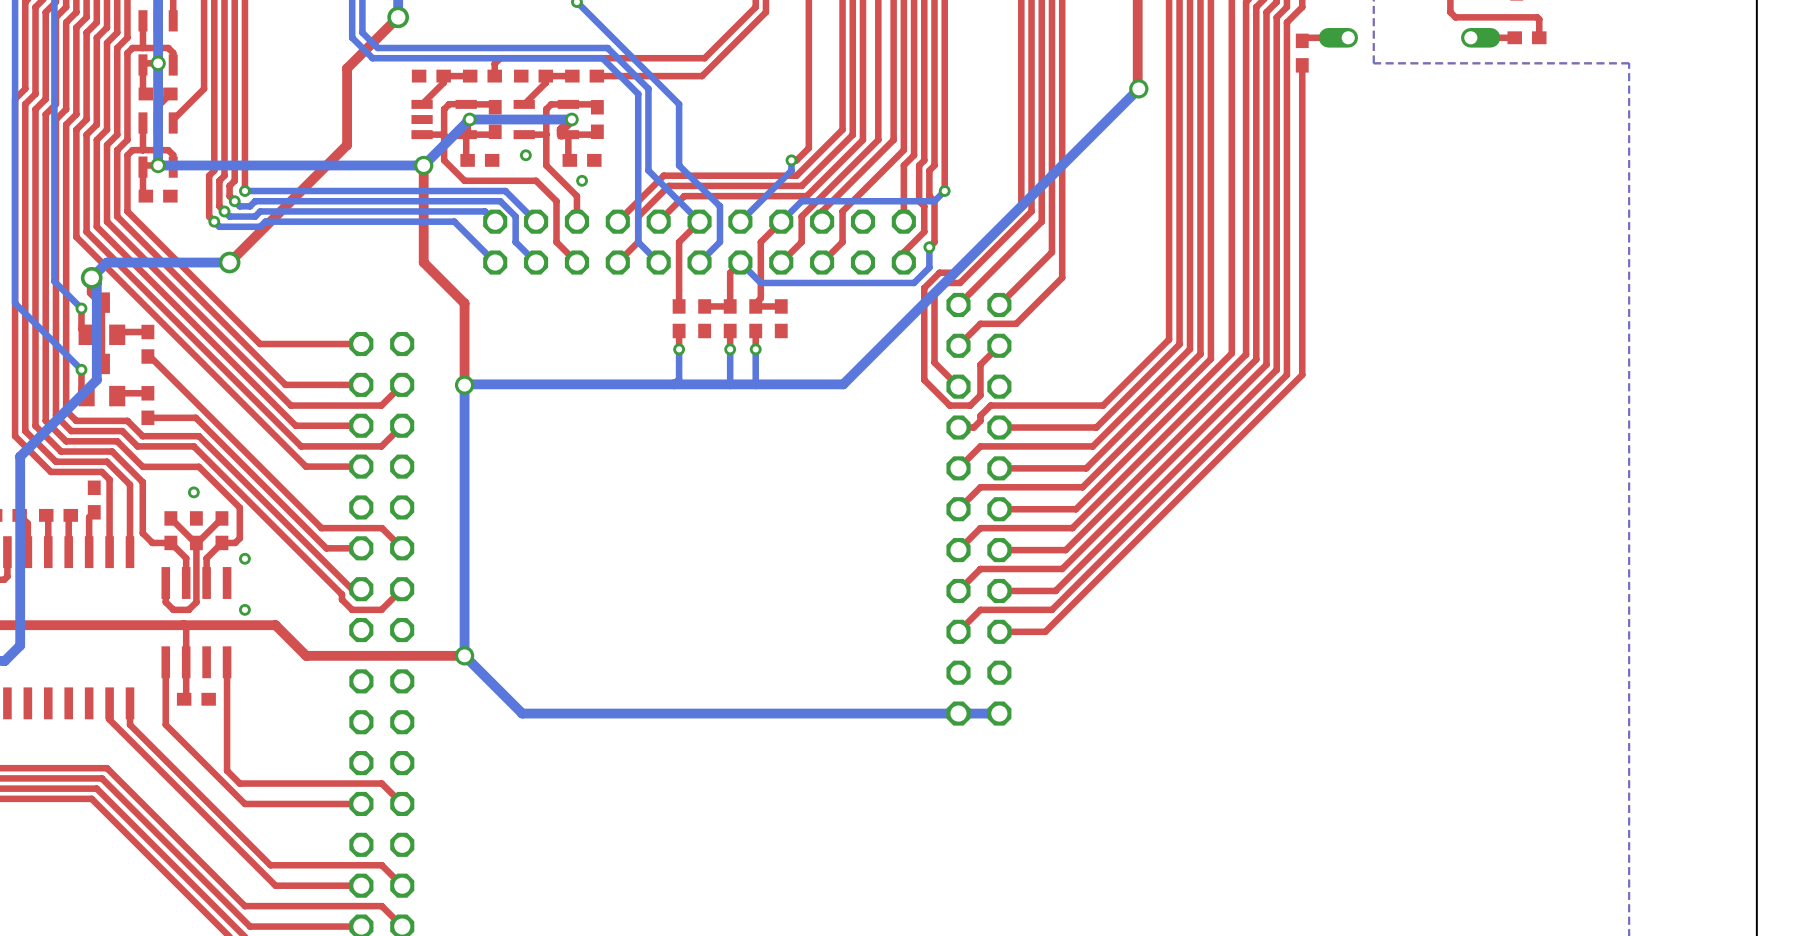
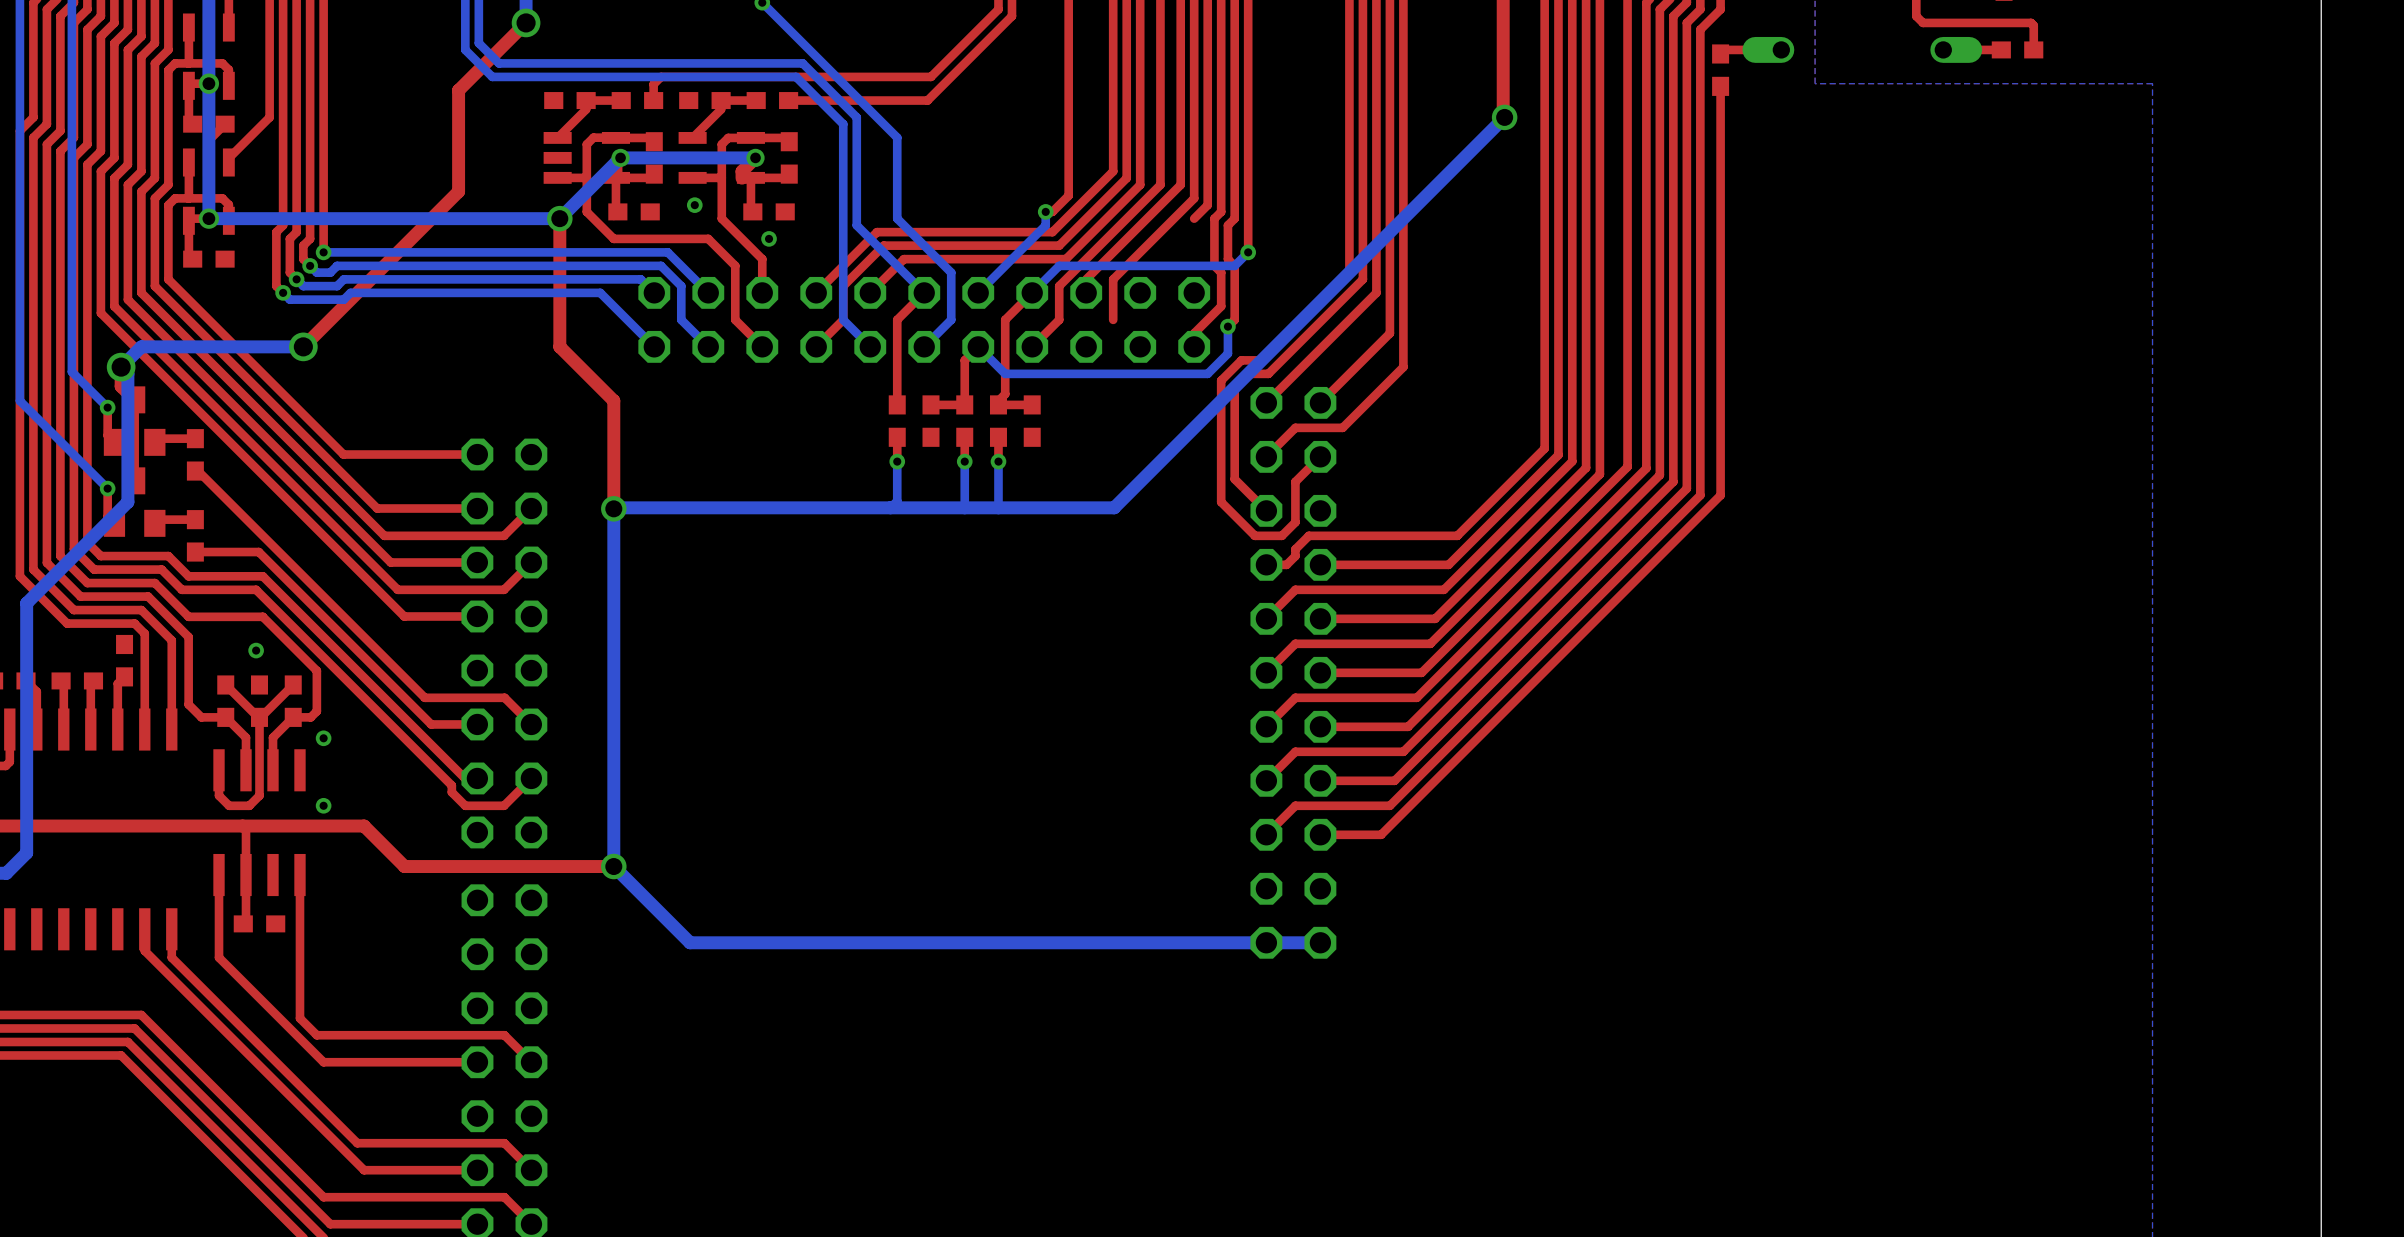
top track: (903, 165) (903, 221) -> none
top track: (842, 242) (822, 262) -> none

